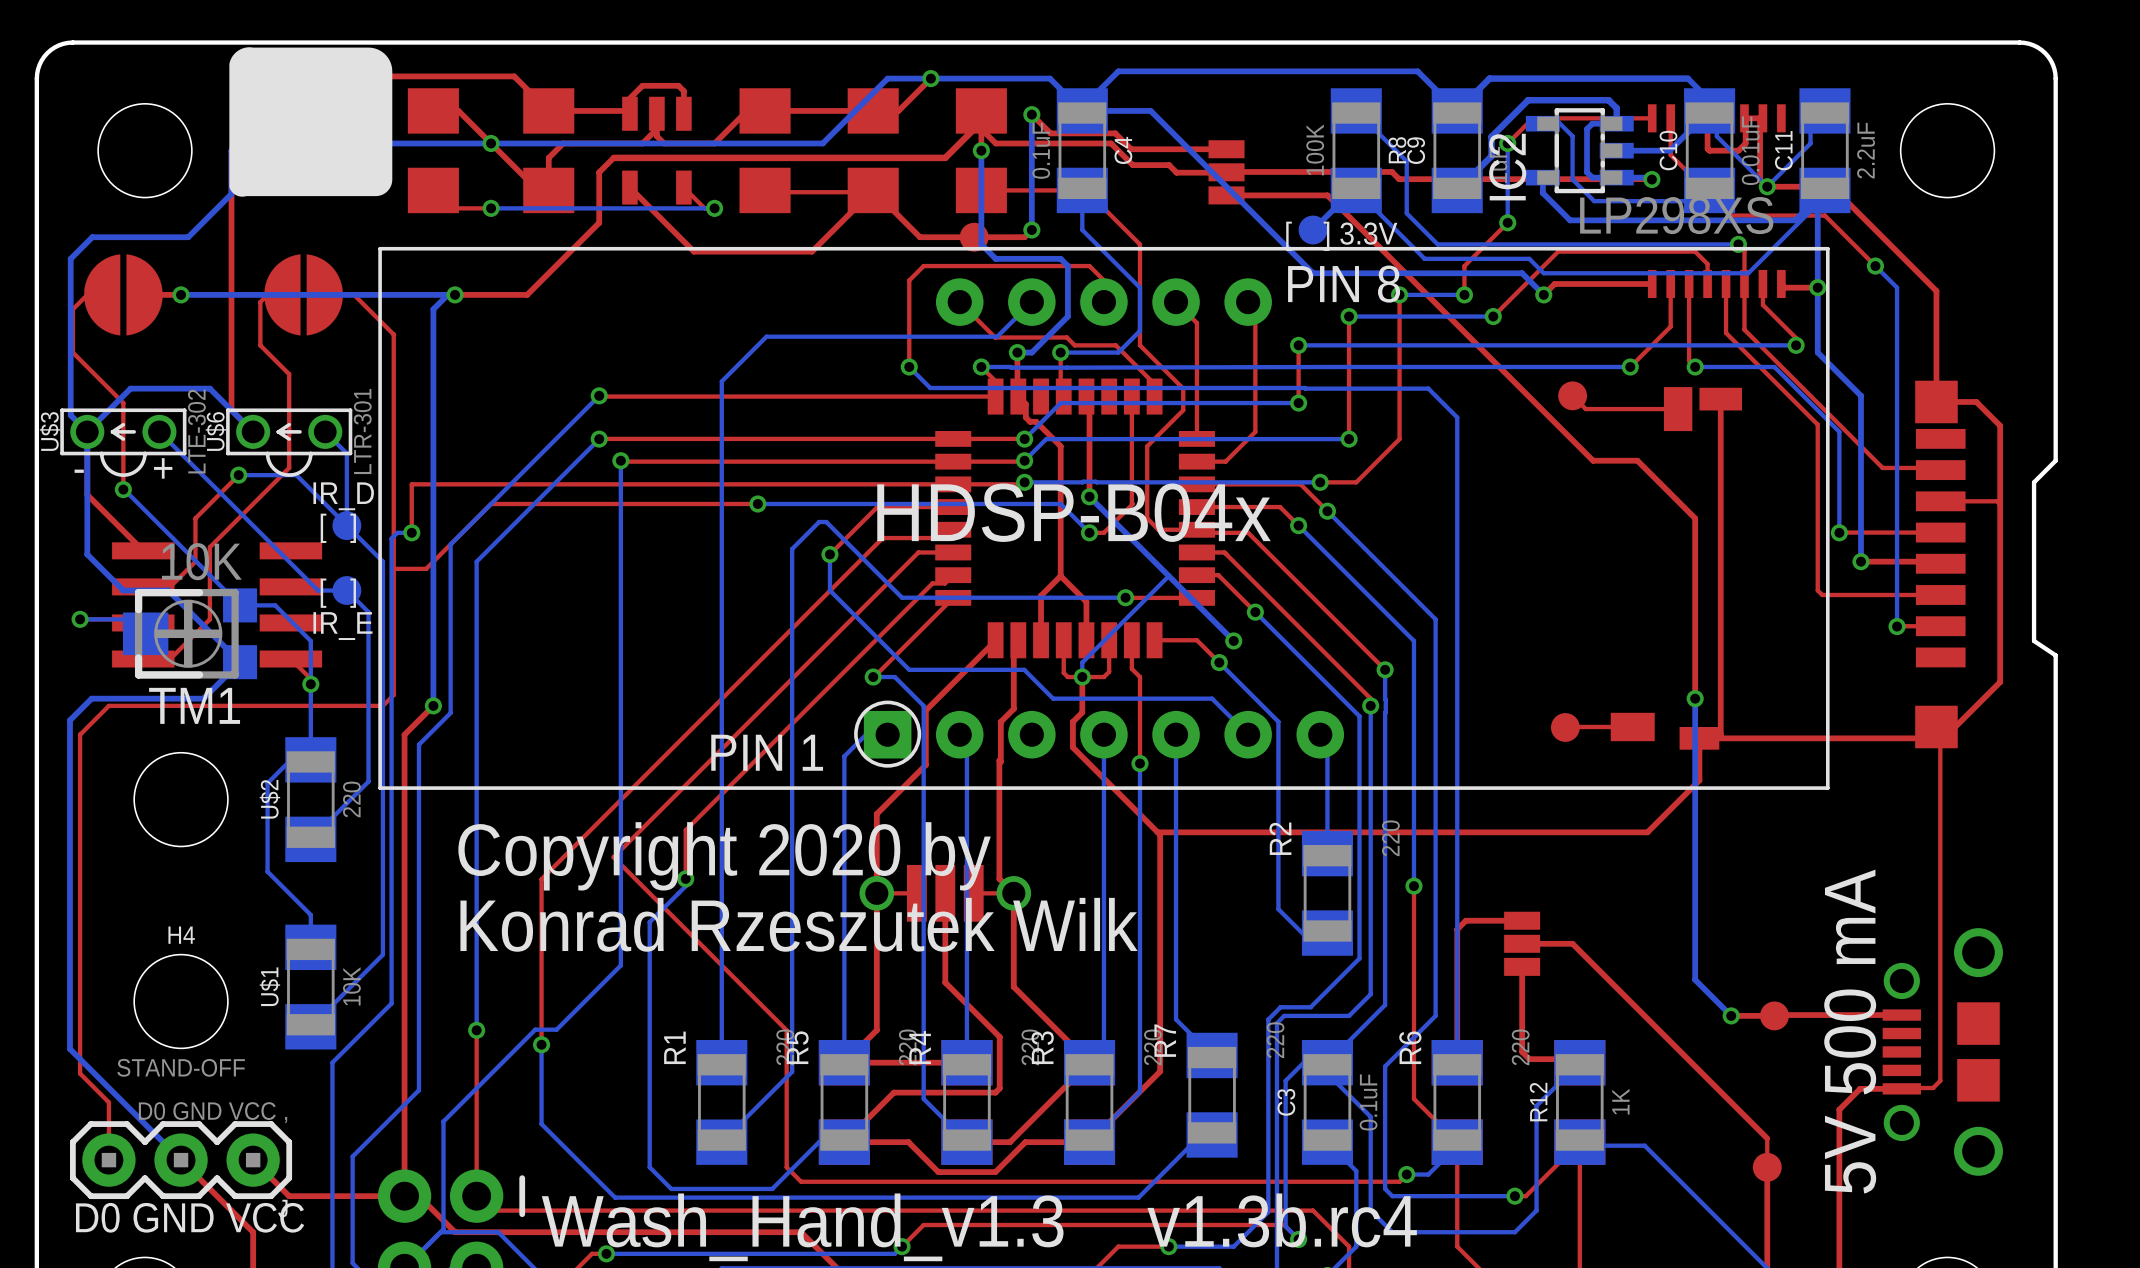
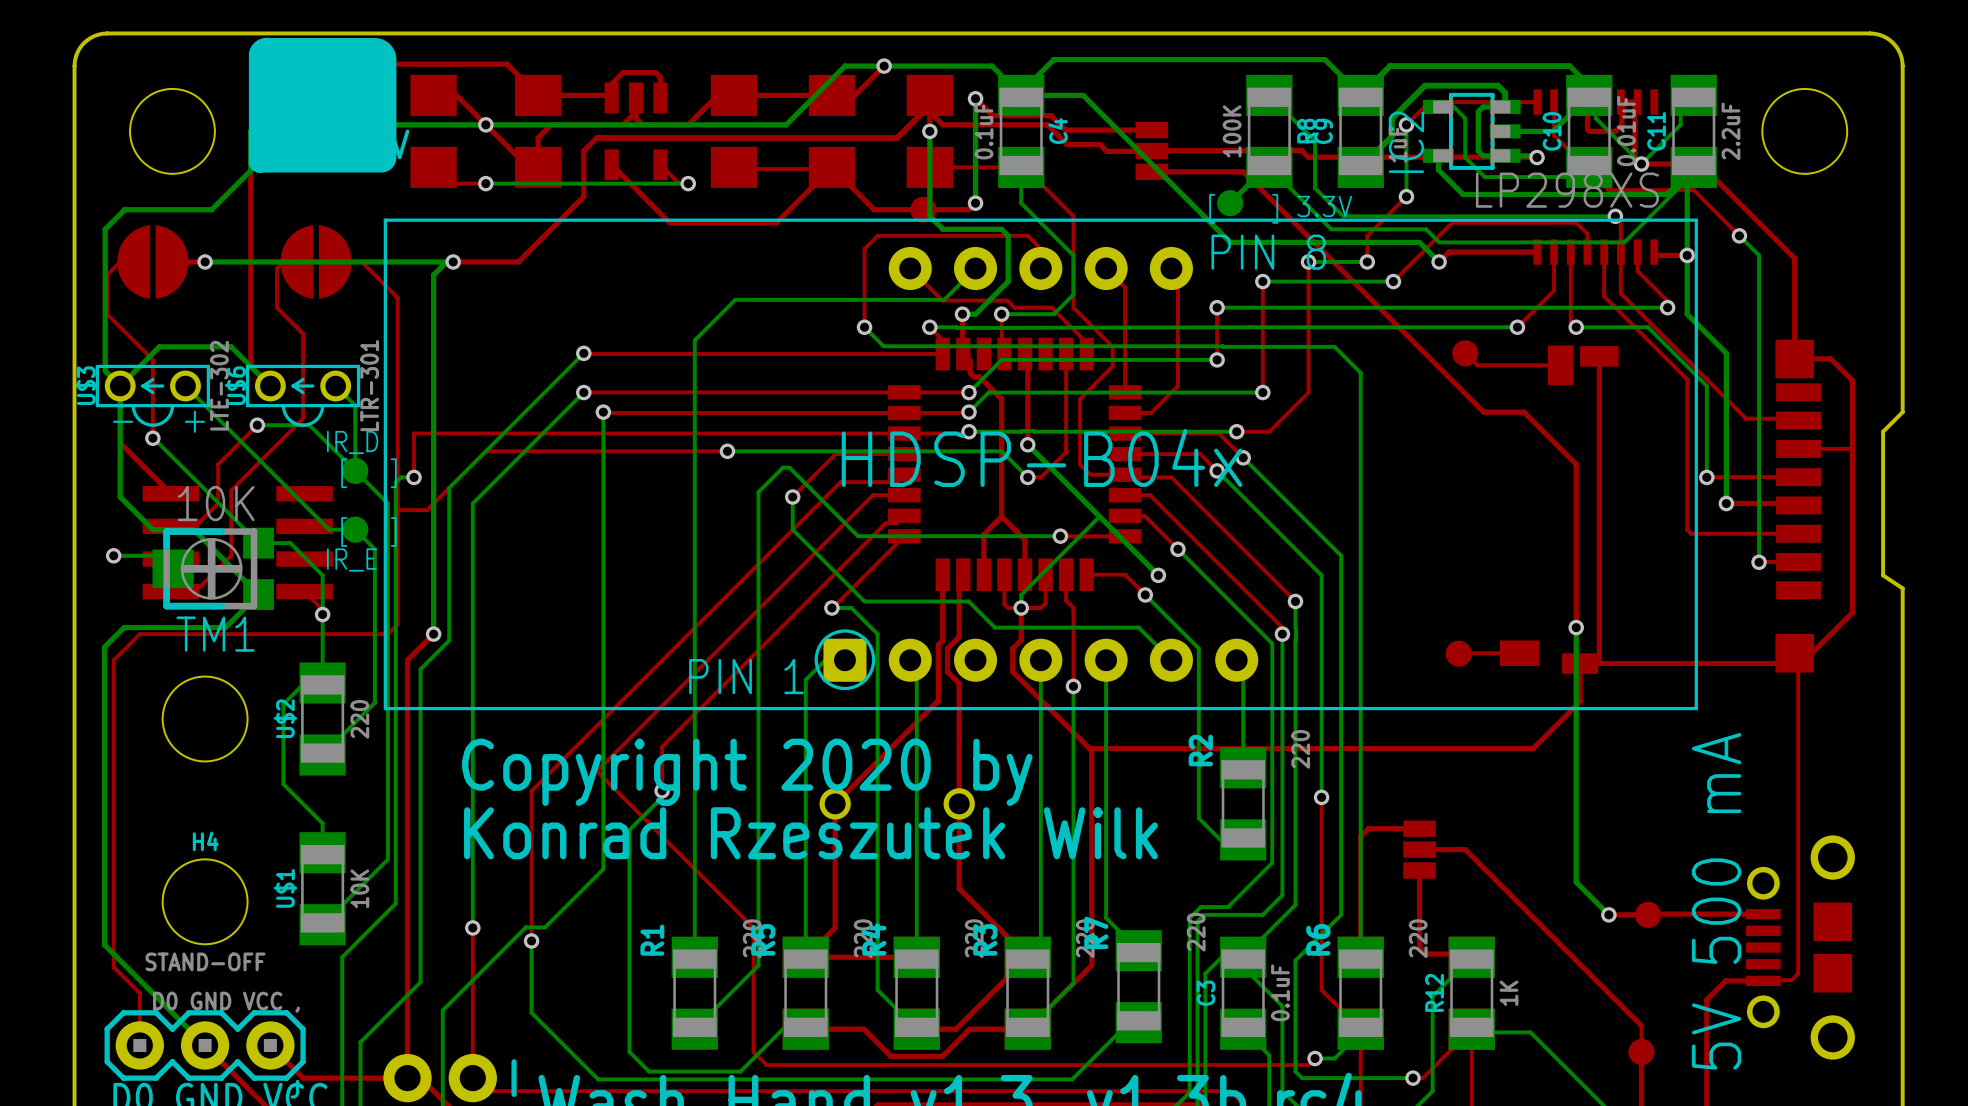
top track: (995, 640) (925, 710) (925, 764) (876, 814) (876, 893) (916, 893) -> (942, 575) (942, 640) (938, 644) (938, 700) (835, 803)
top track: (1000, 747) (999, 878) (1013, 893) (973, 893) -> (947, 671) (959, 683) (959, 803)
top track: (945, 893) (945, 982) (999, 1036) (999, 1088) (995, 1092) (893, 1092) (844, 1142) -> none
part: (945, 893) -> none

